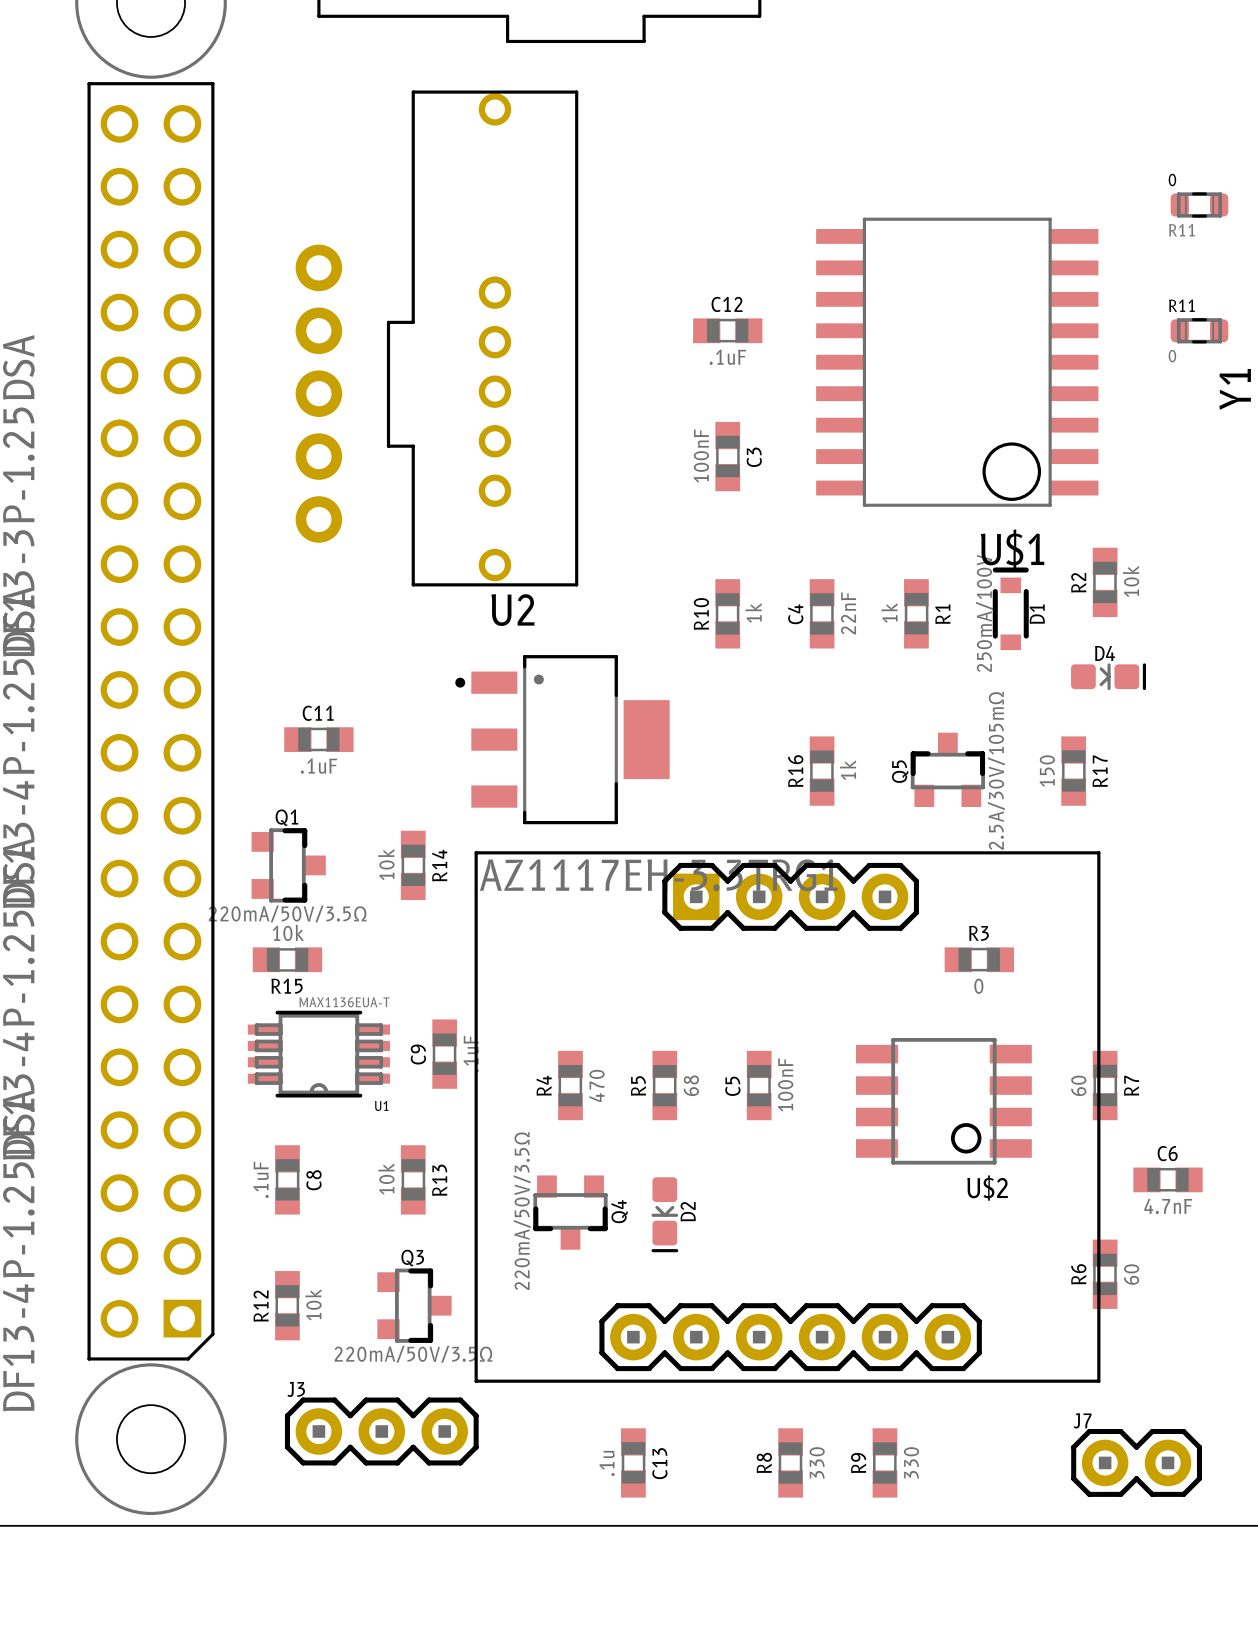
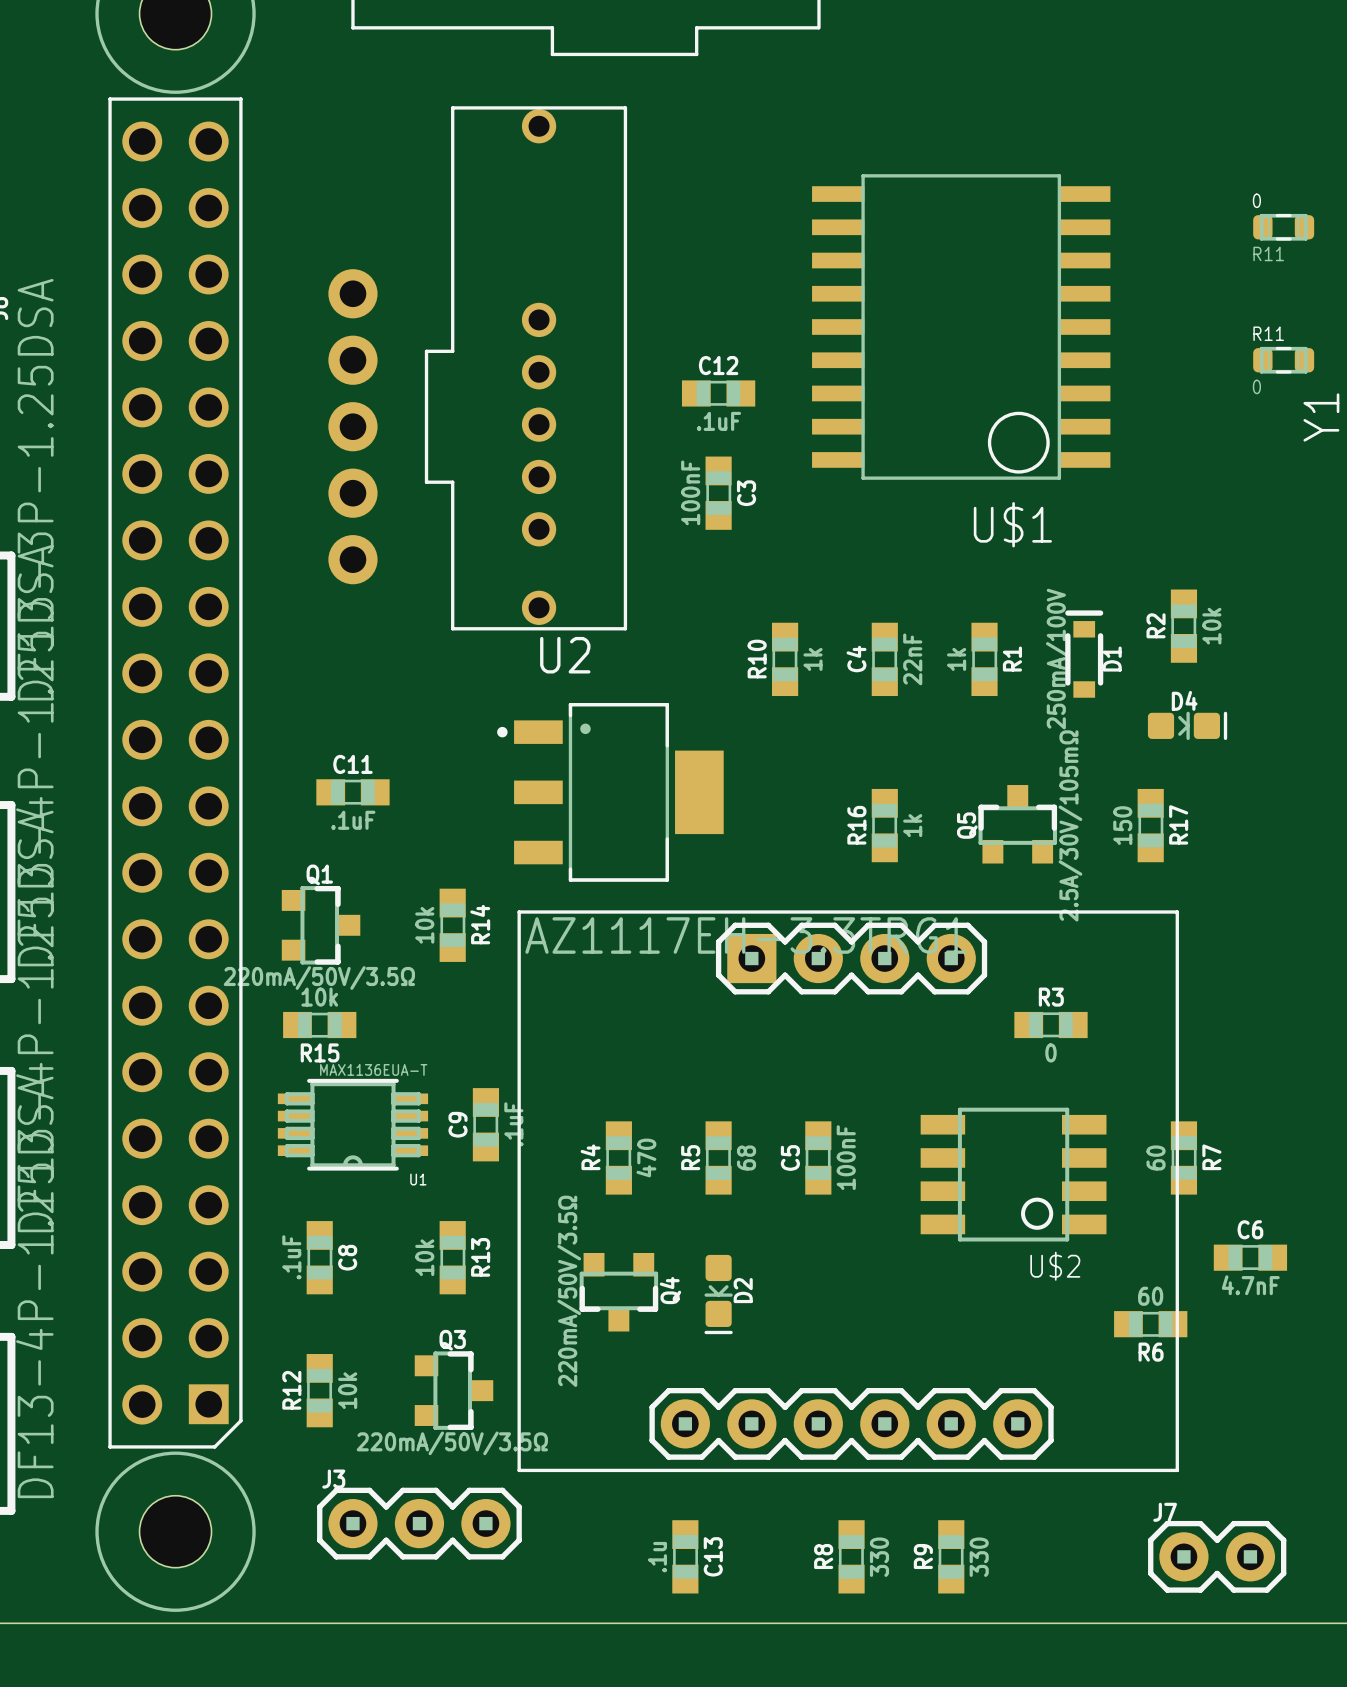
C12 position: (727, 330) -> (718, 393)
U$1 position: (957, 362) -> (961, 327)
C3 position: (727, 456) -> (718, 493)
R6 rotation: 0° (1105, 1274) -> 90° clockwise (1150, 1324)
R6 position: (1105, 1274) -> (1150, 1324)

